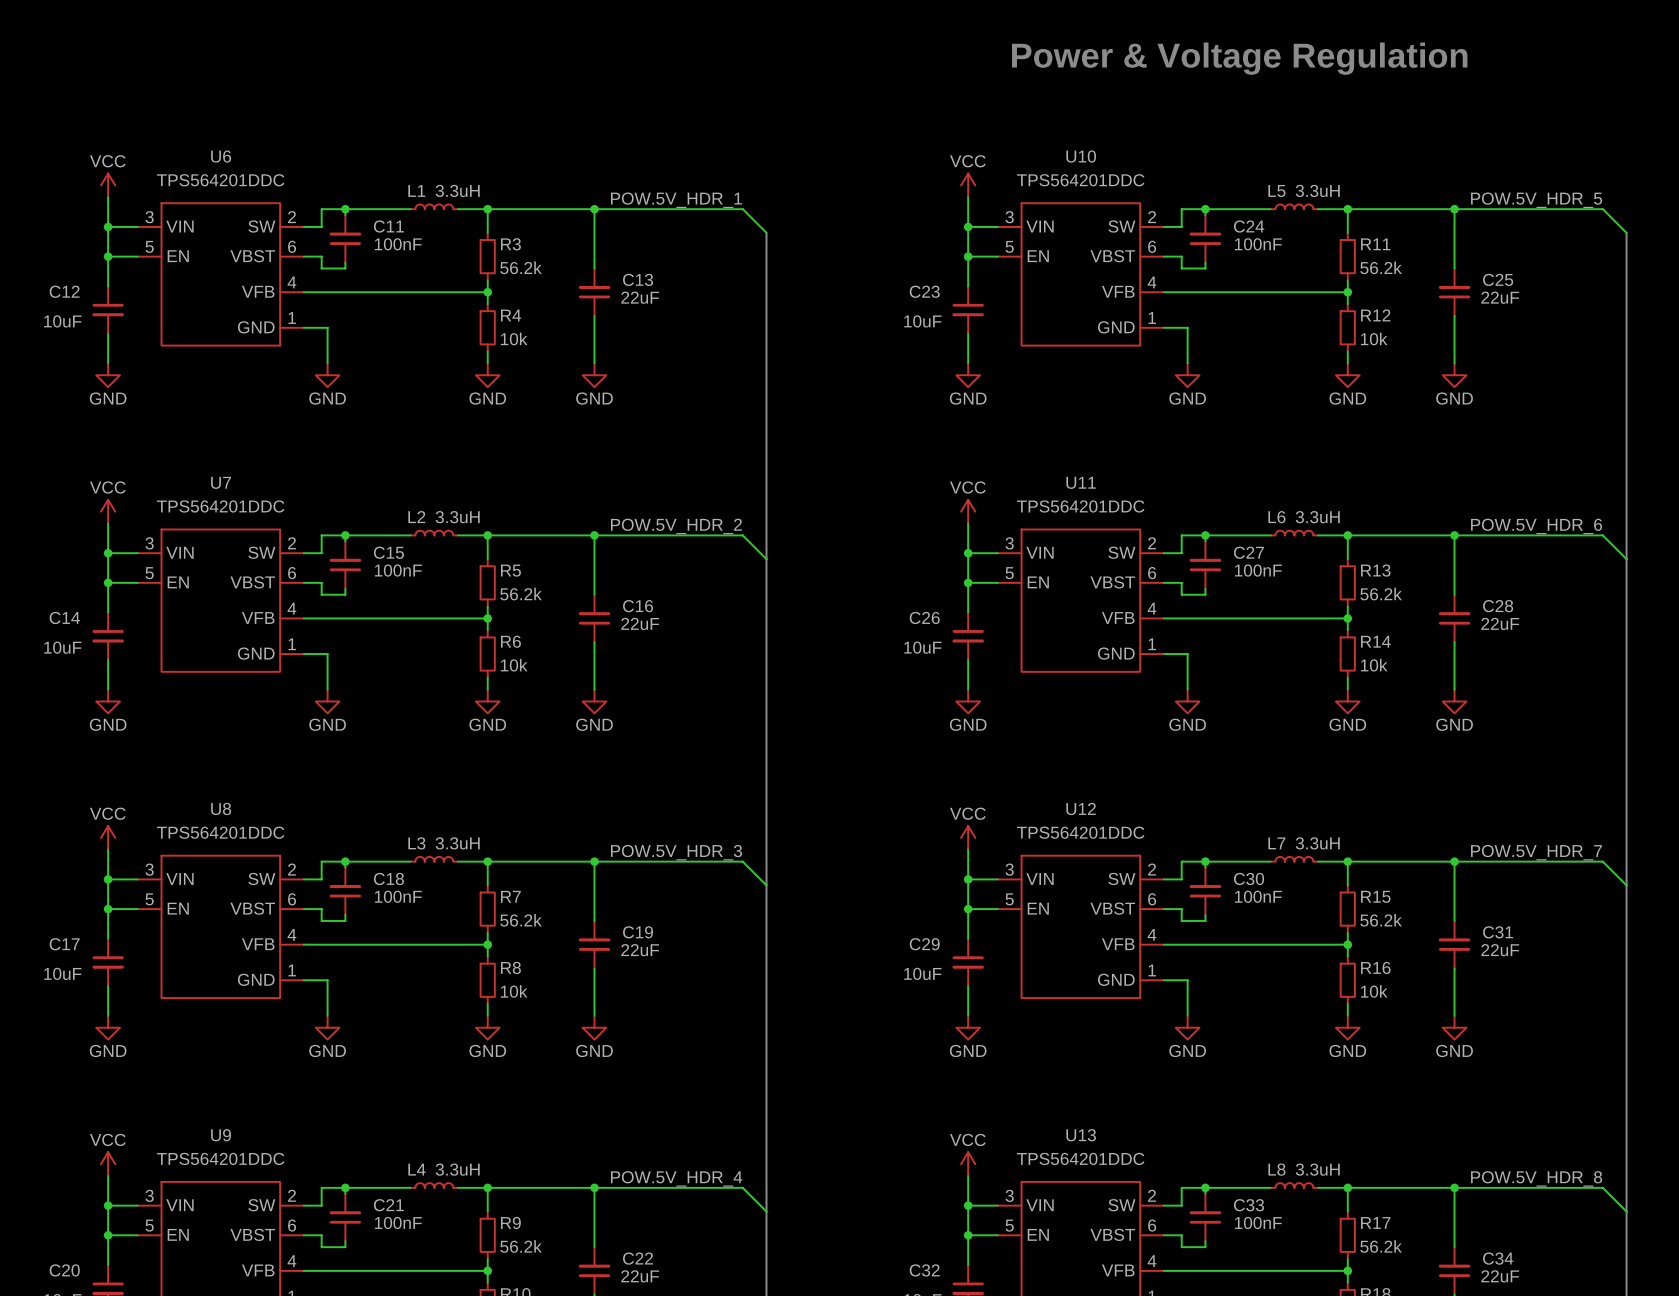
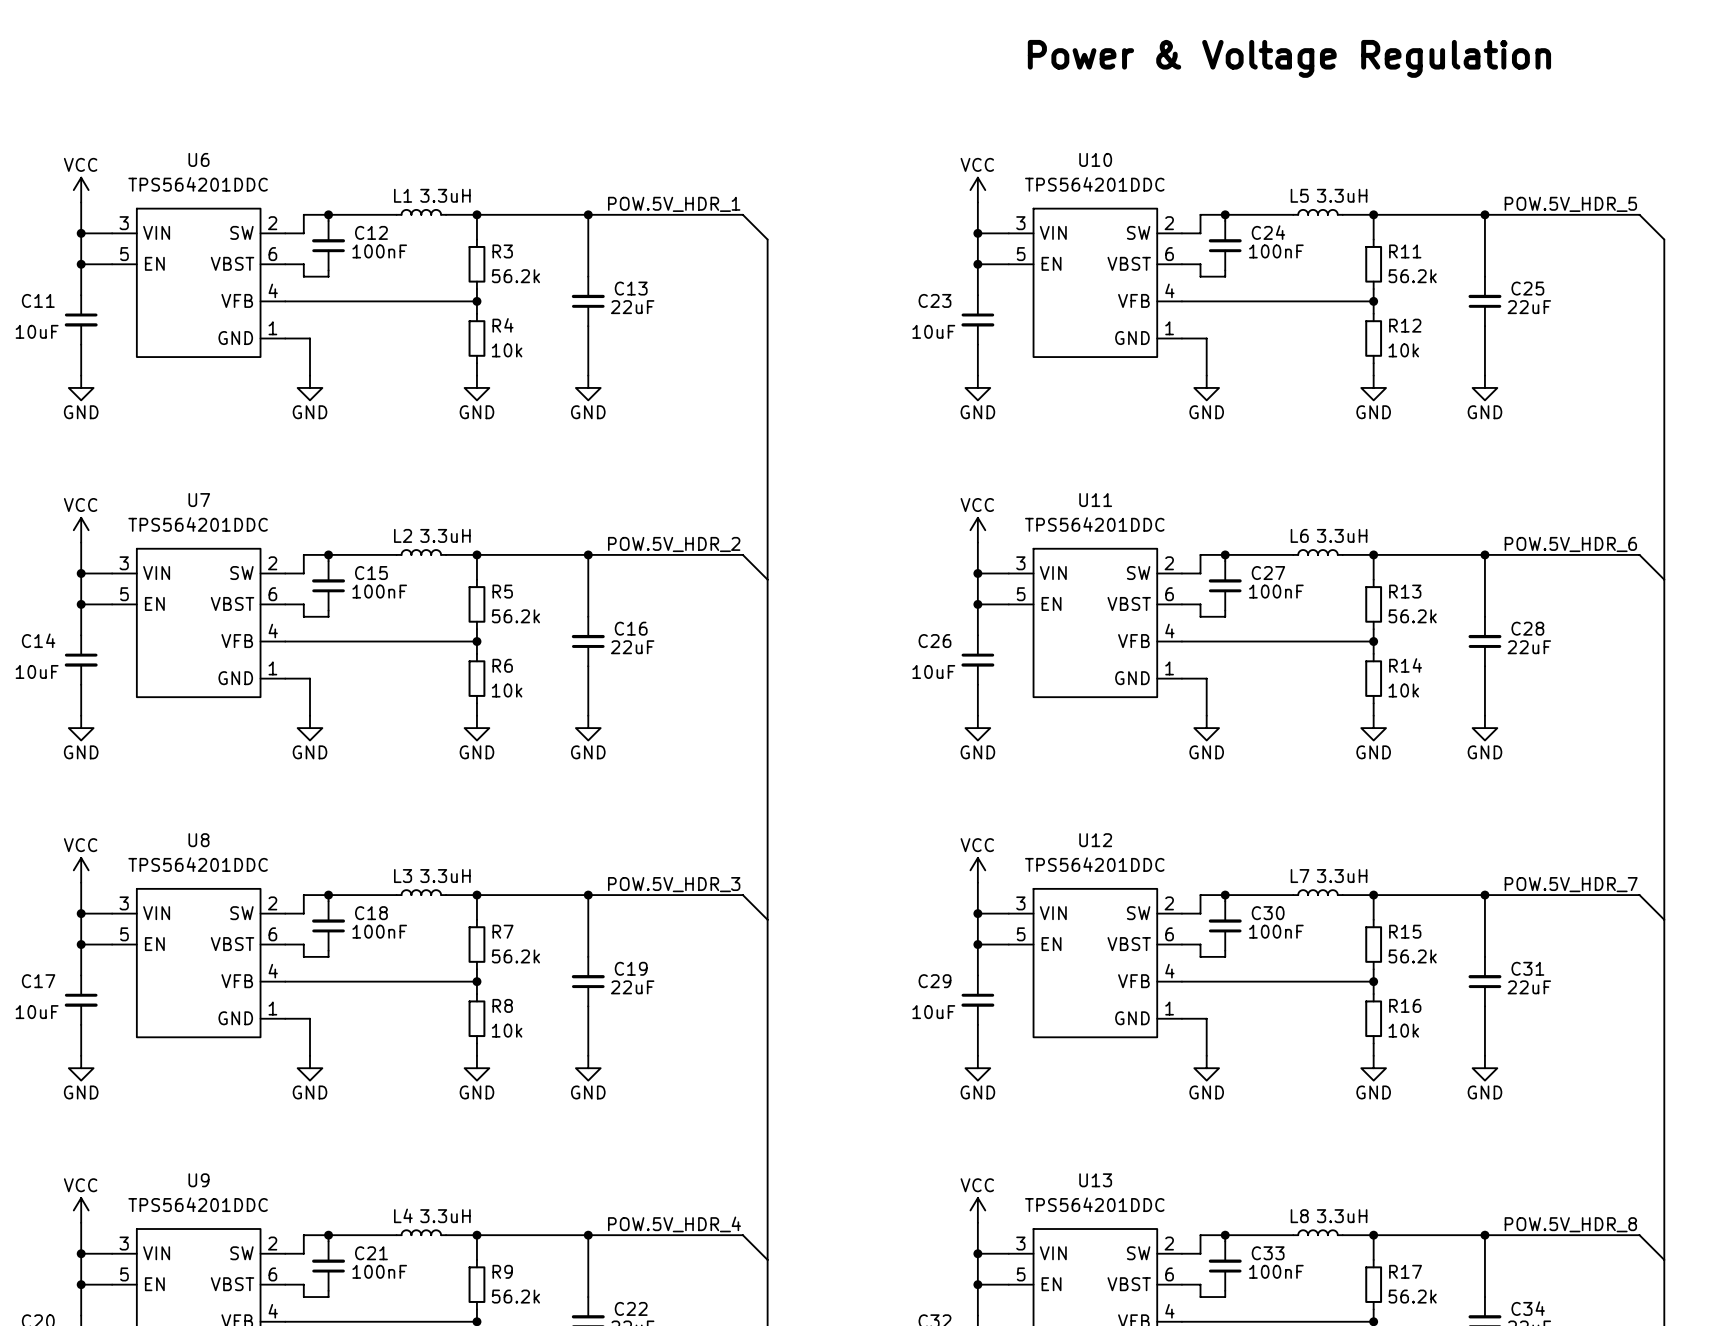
C11 name: C11 (388, 226) -> C12 (371, 232)
C12 name: C12 (64, 291) -> C11 (38, 300)

